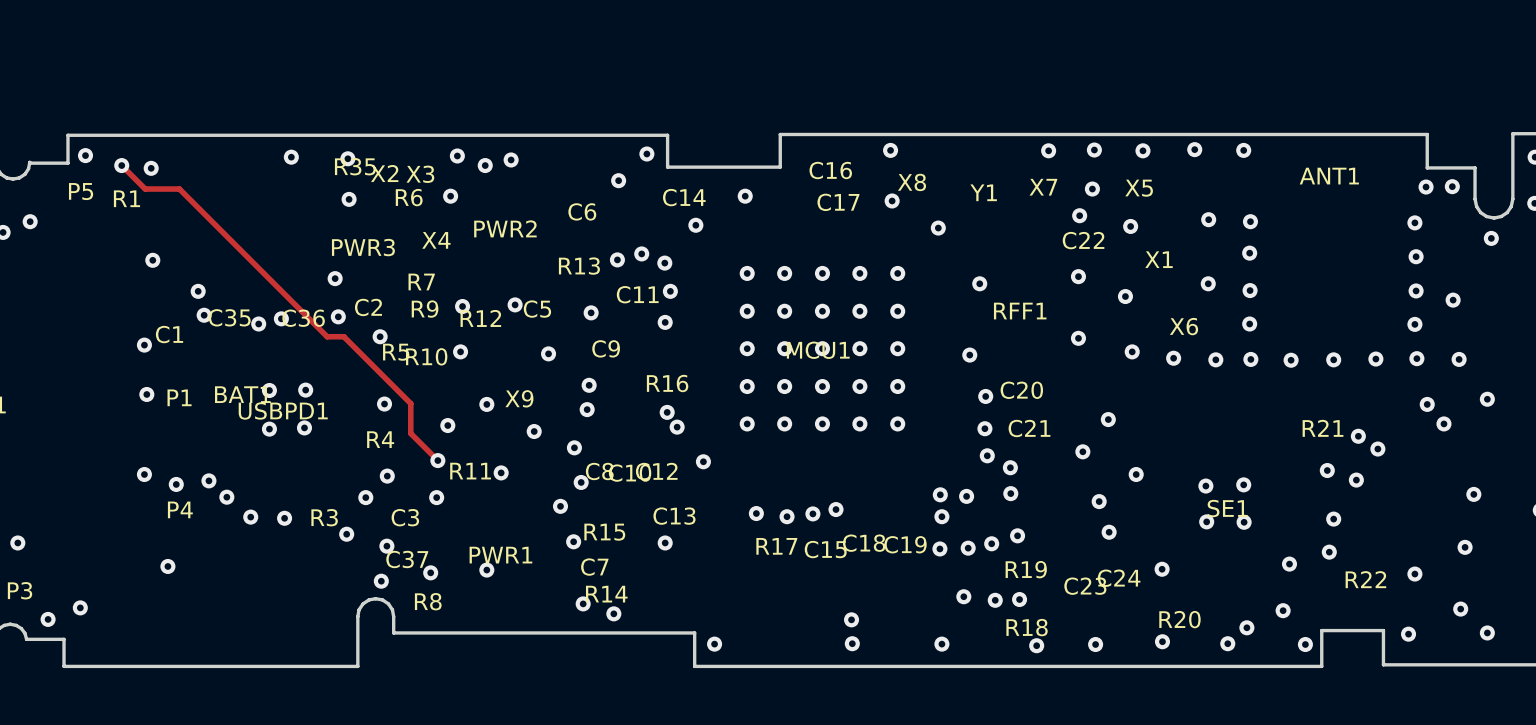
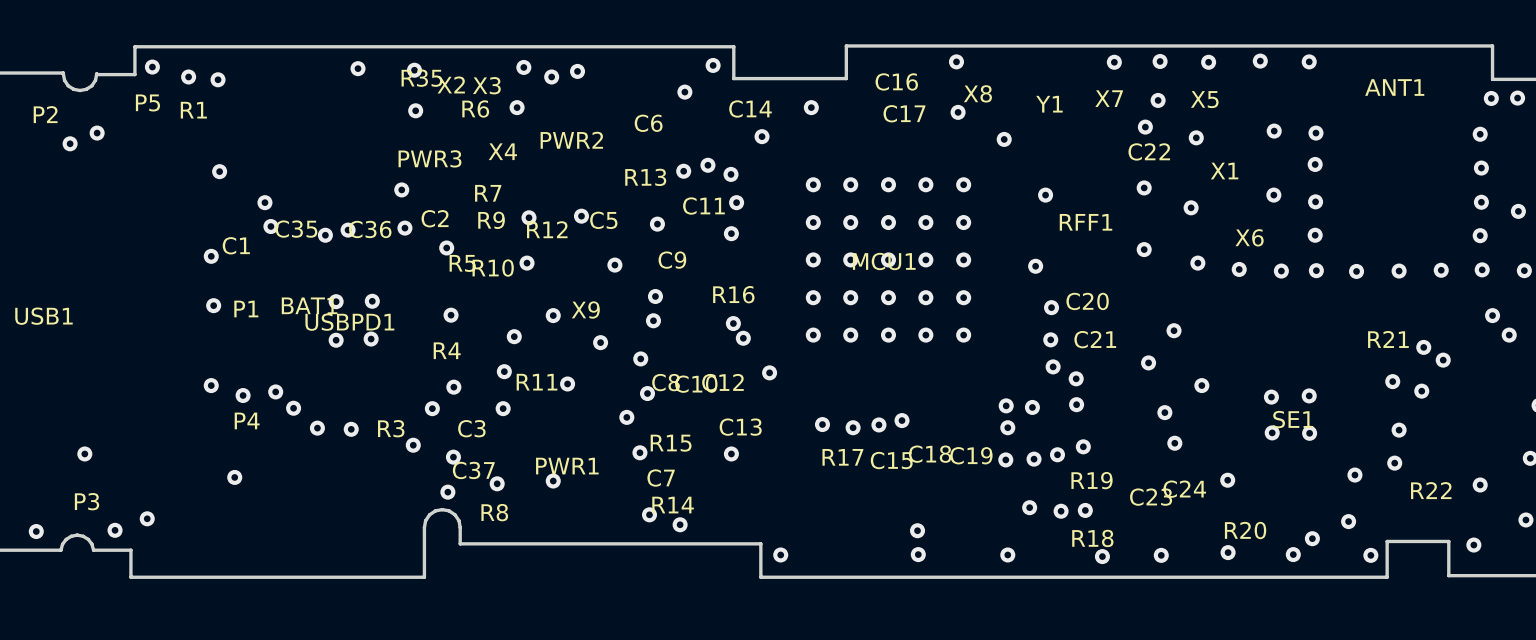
track: (121, 165) (145, 189) (179, 189) (327, 336) (343, 336) (410, 403) (410, 433) (437, 460) -> none

